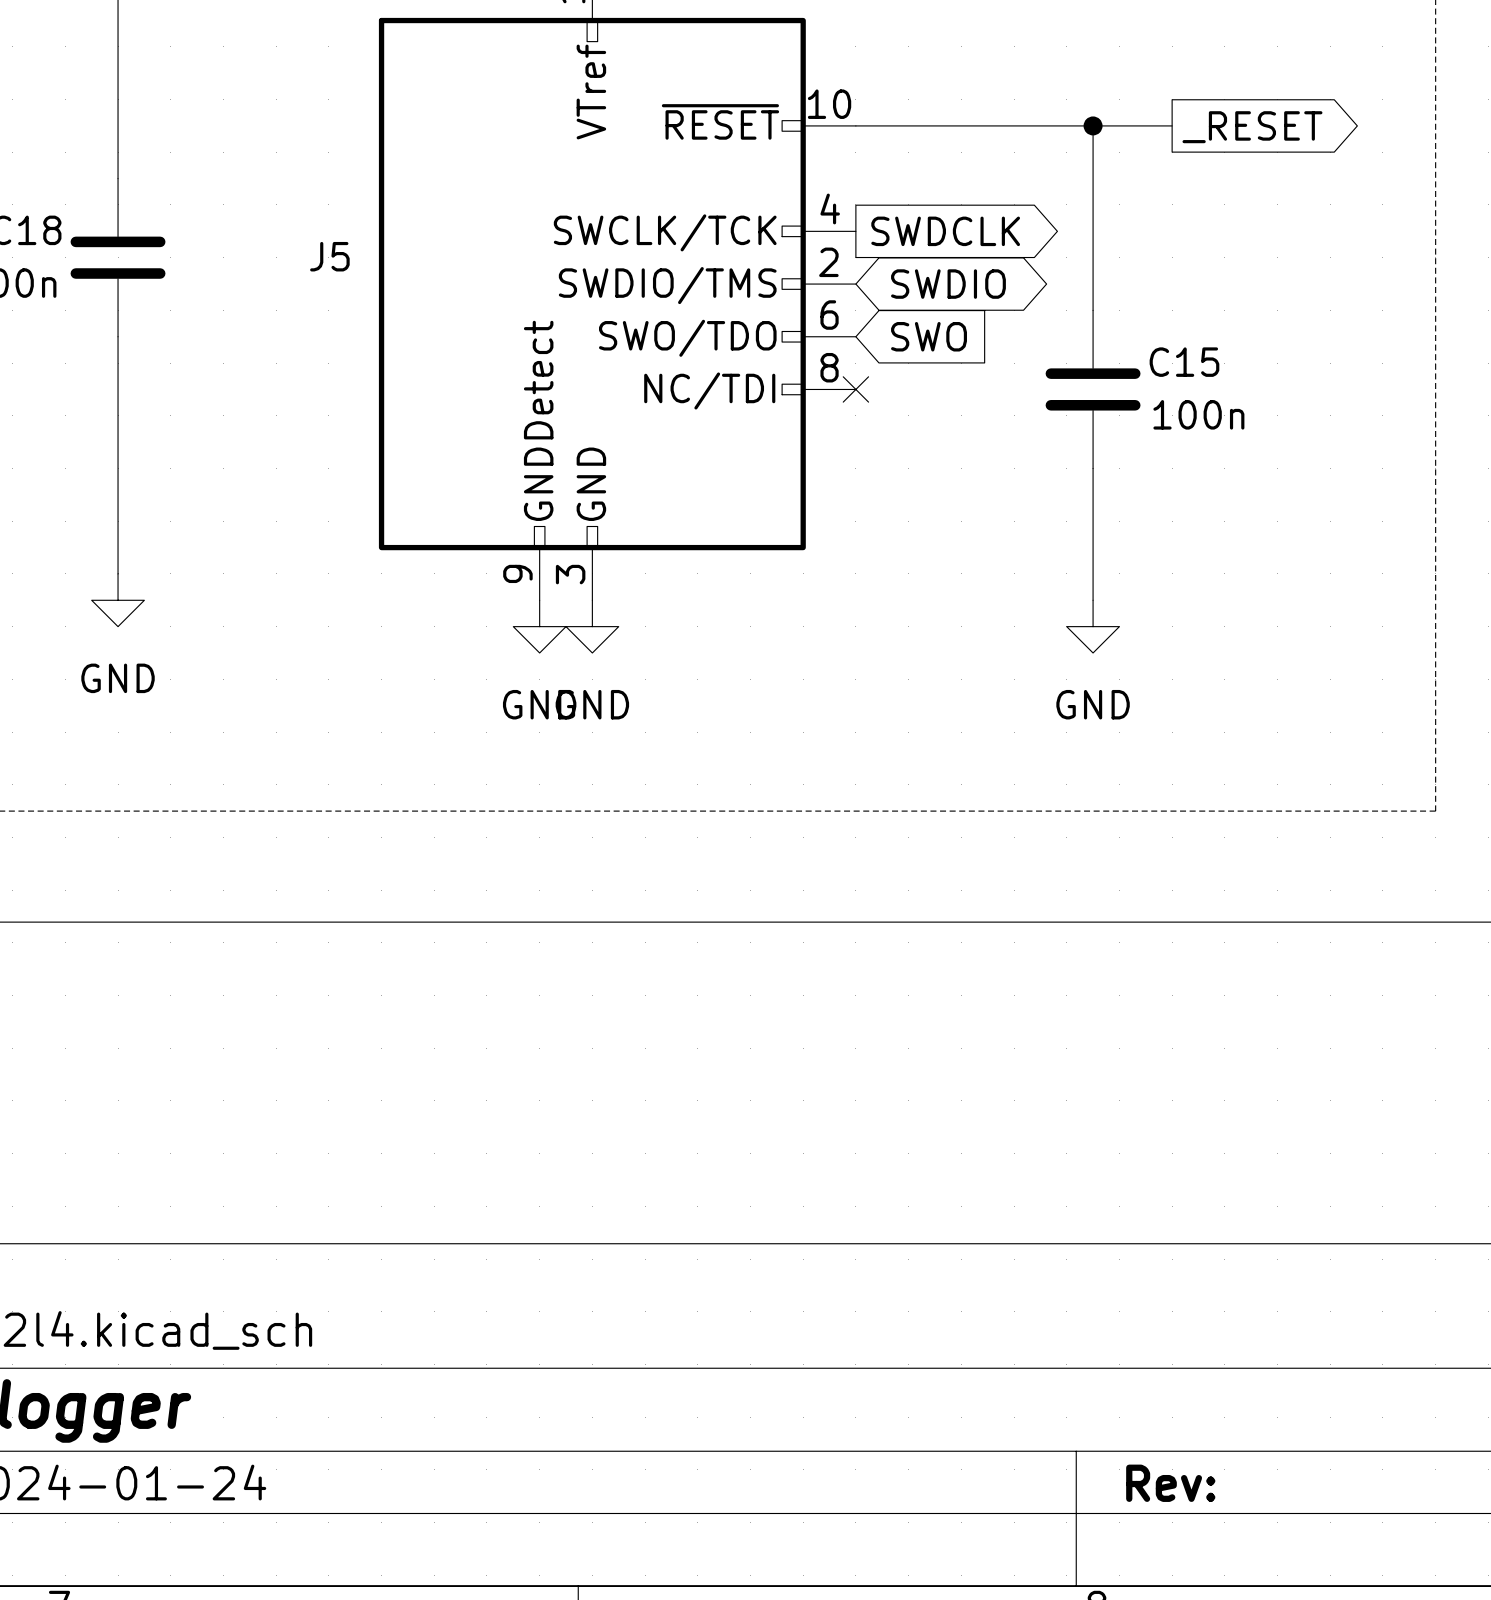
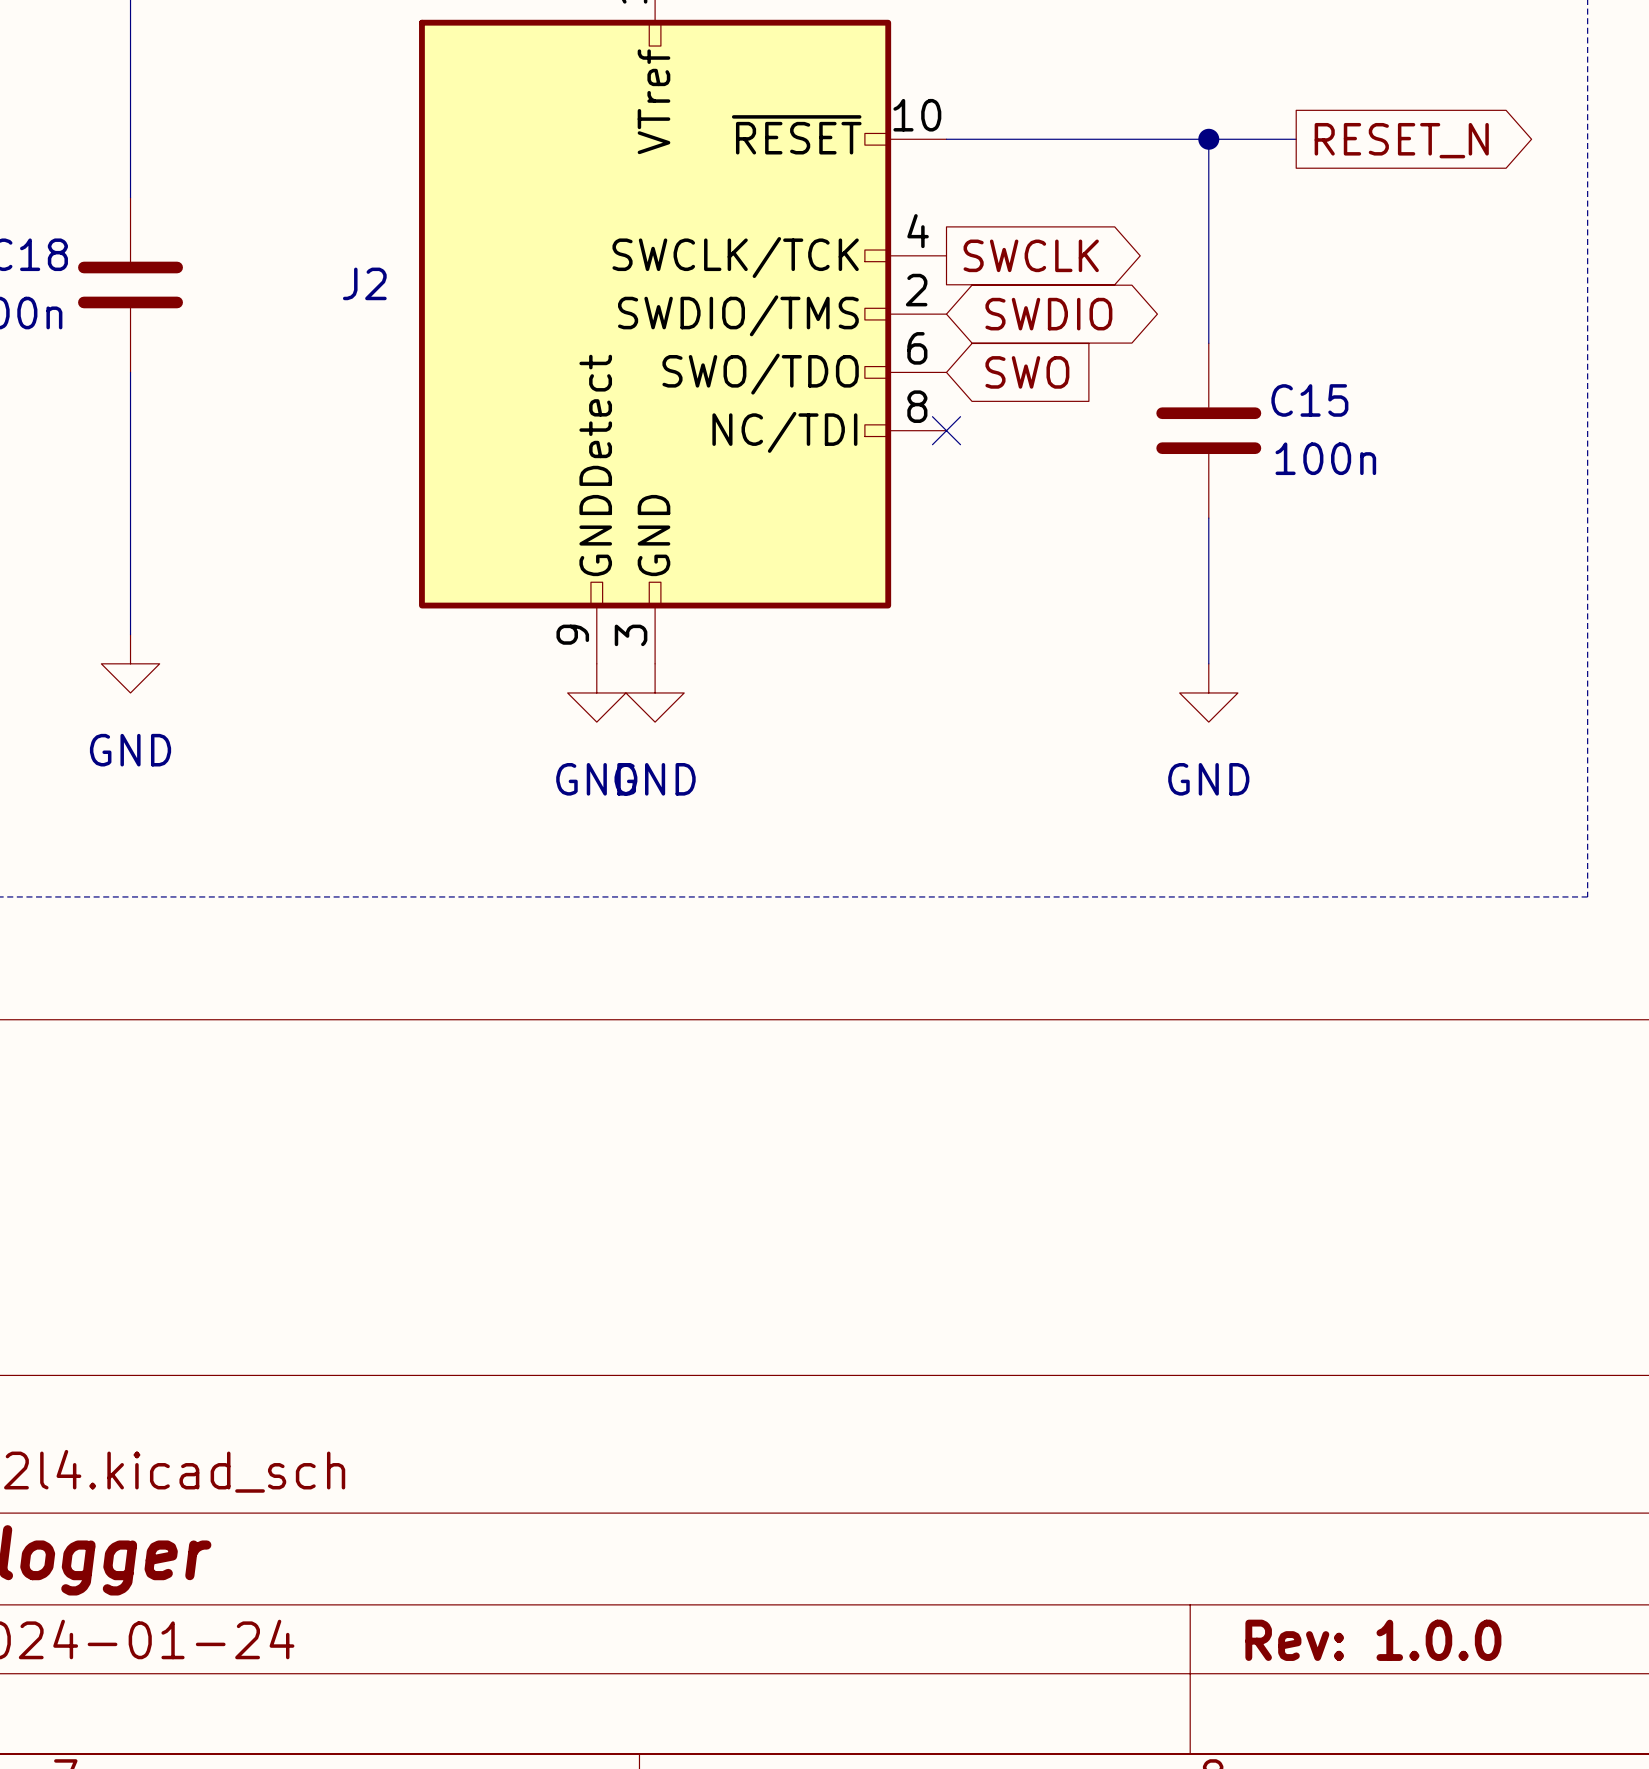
global label: _RESET (1252, 127) -> RESET_N (1401, 140)
global label: SWDCLK (945, 231) -> SWCLK (1031, 255)
J5 name: J5 (329, 256) -> J2 (364, 283)
title block: Rev: (1170, 1483) -> Rev: 1.0.0 (1373, 1640)

